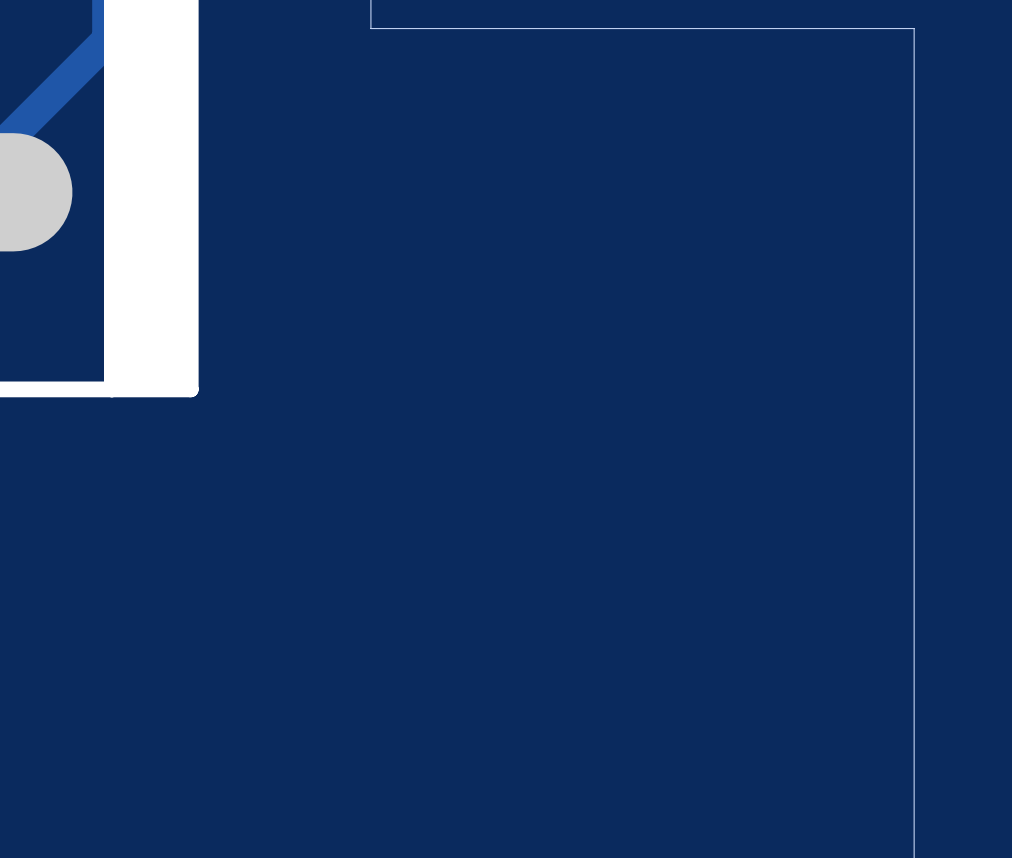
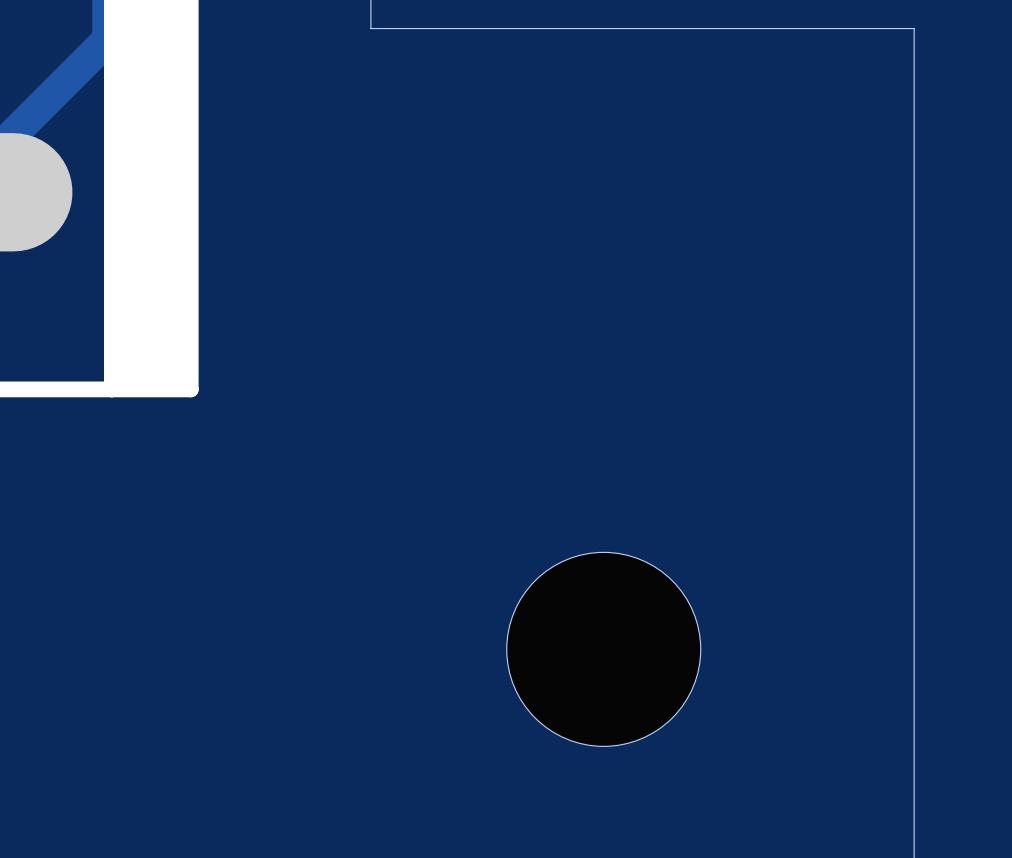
hole: none -> (603, 649)

